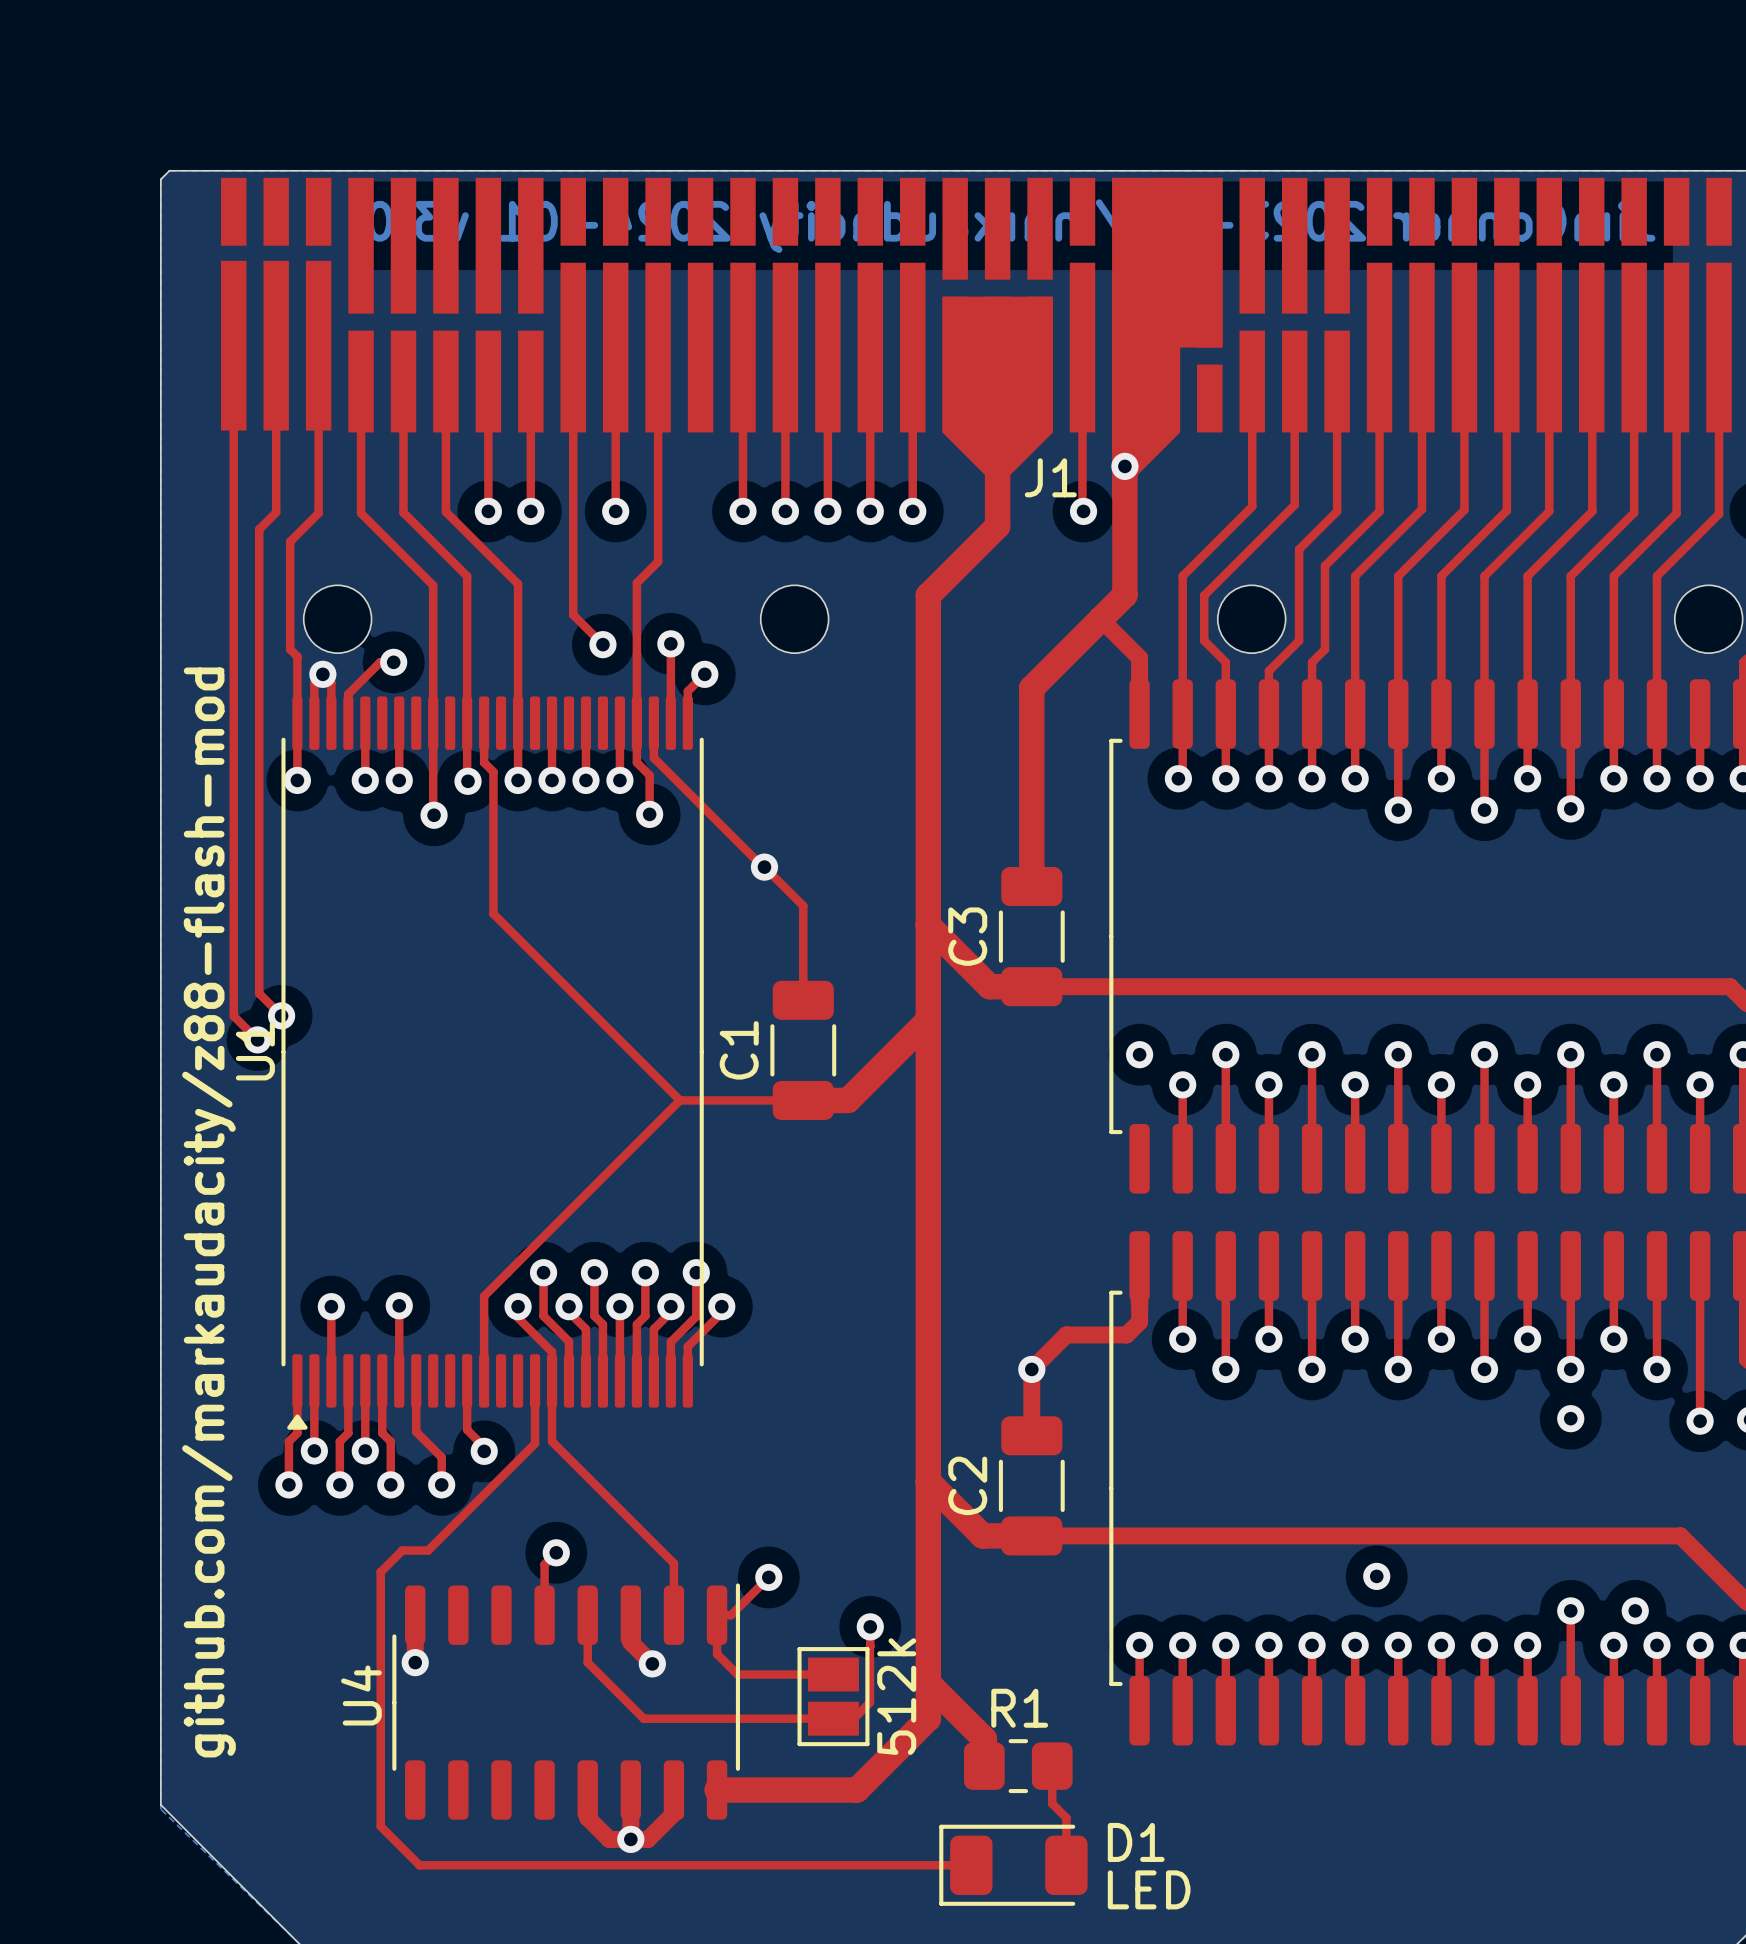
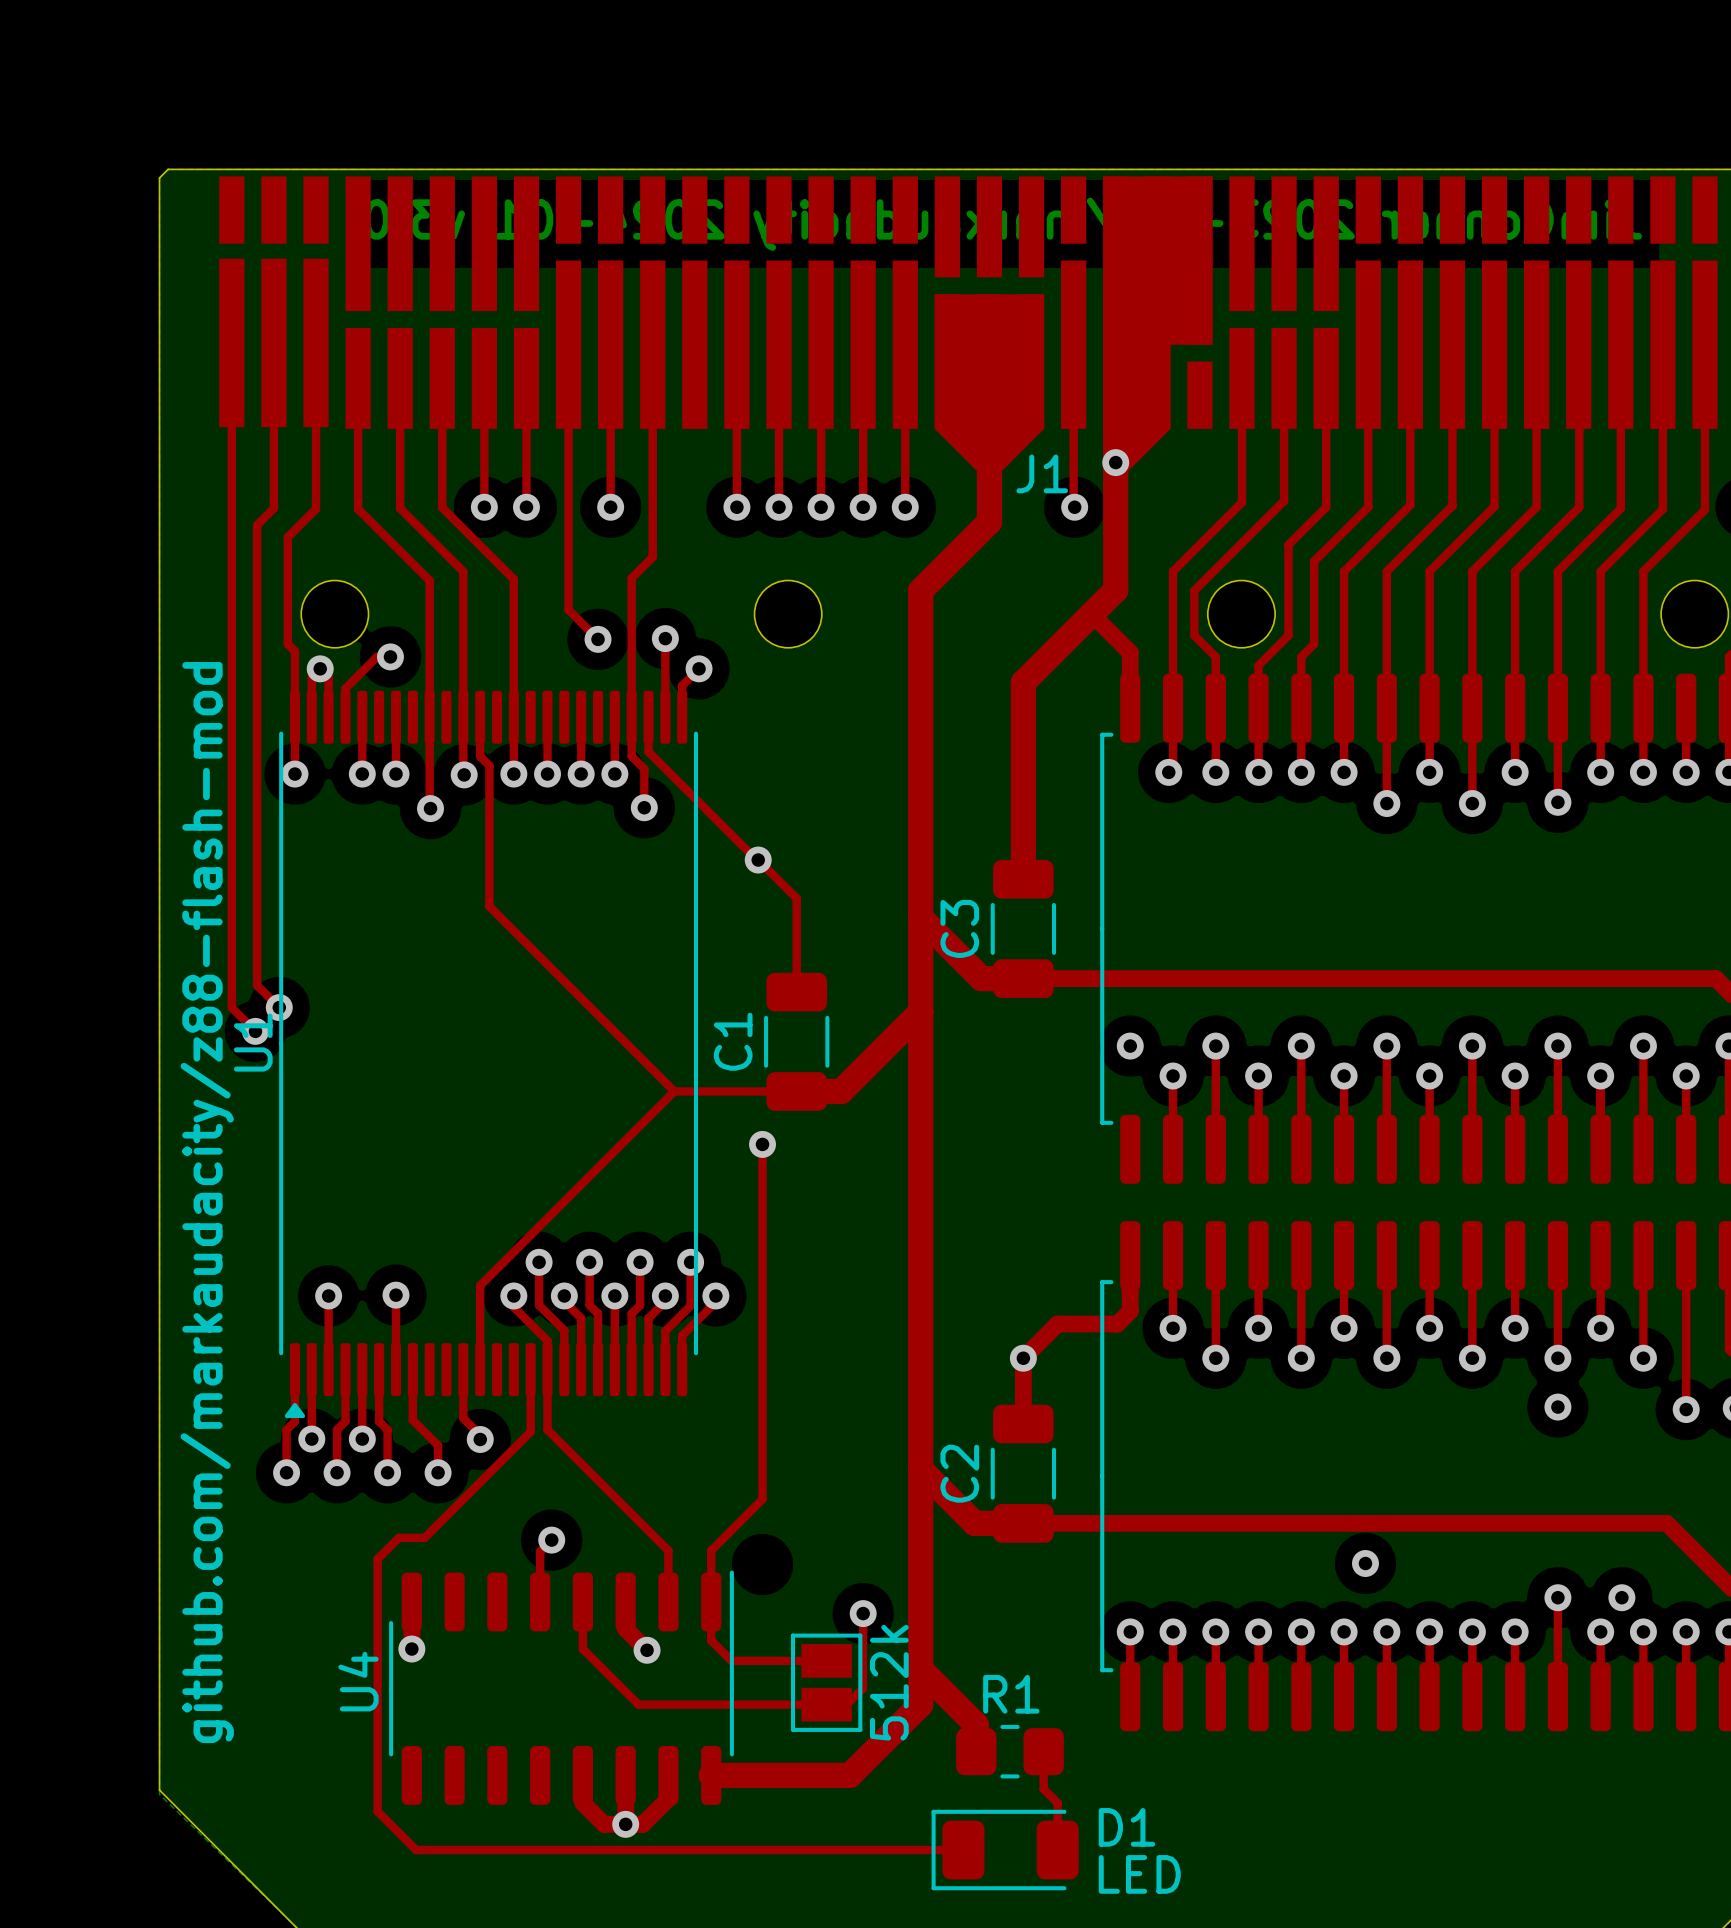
via: none -> (762, 1144)
top track: (768, 1577) (731, 1615) (717, 1615) -> (762, 1144) (762, 1499) (711, 1550) (711, 1601)
via: (768, 1577) -> none

